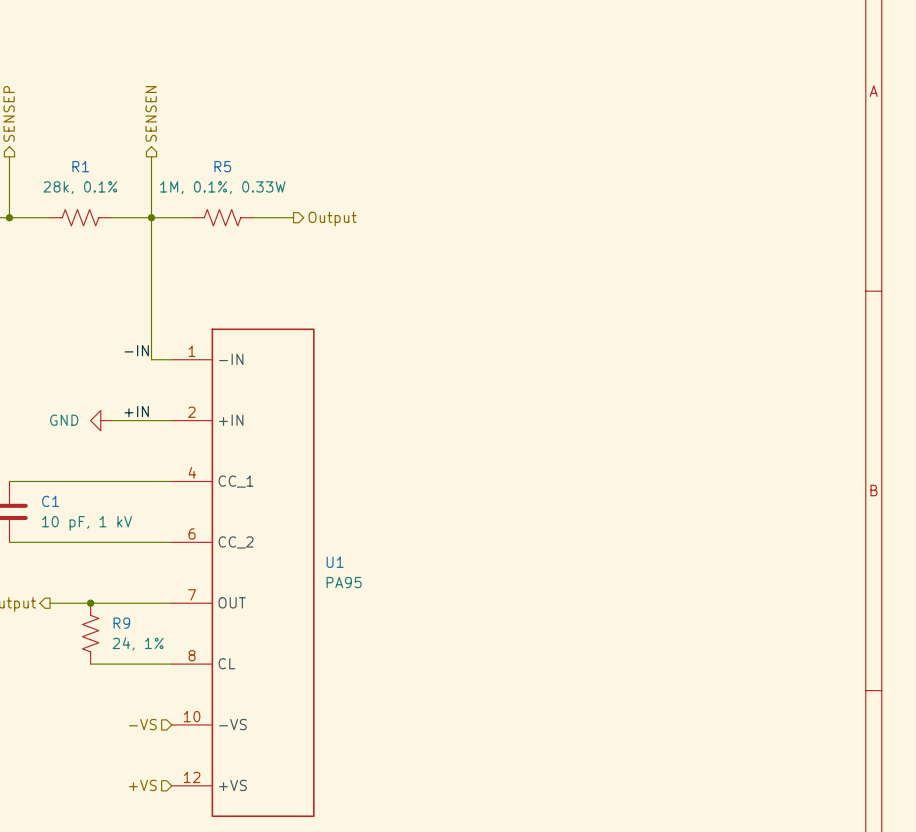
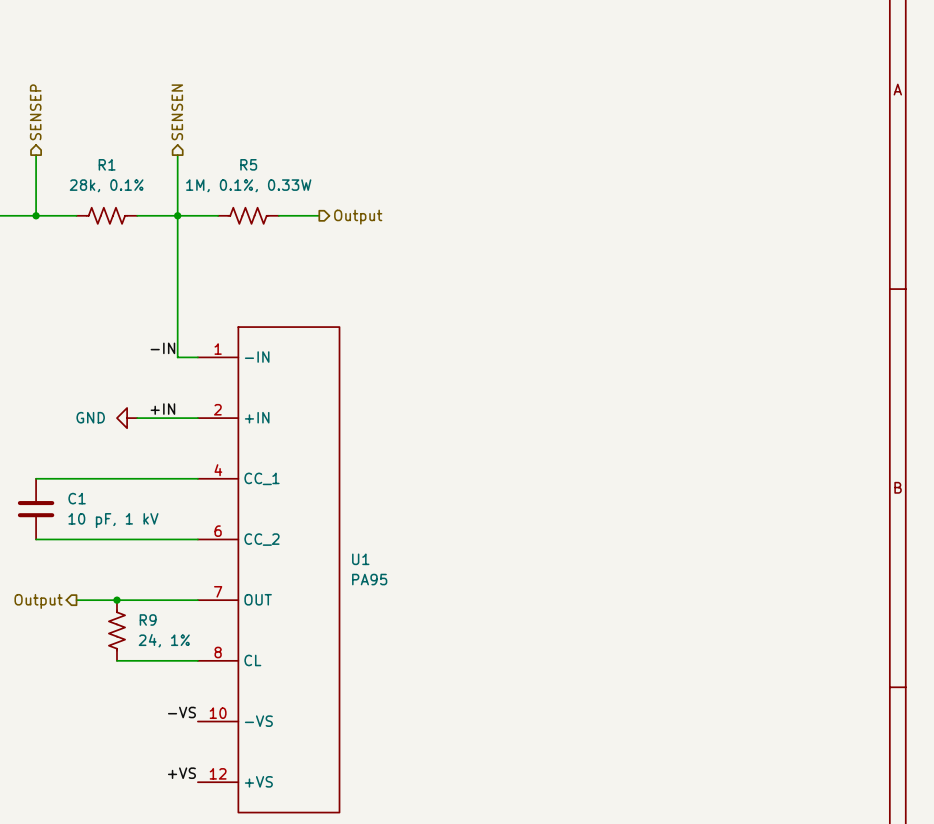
label: none -> -VS (181, 712)
hierarchical label: -VS (142, 724) -> none
label: none -> +VS (181, 773)
hierarchical label: +VS (142, 785) -> none

